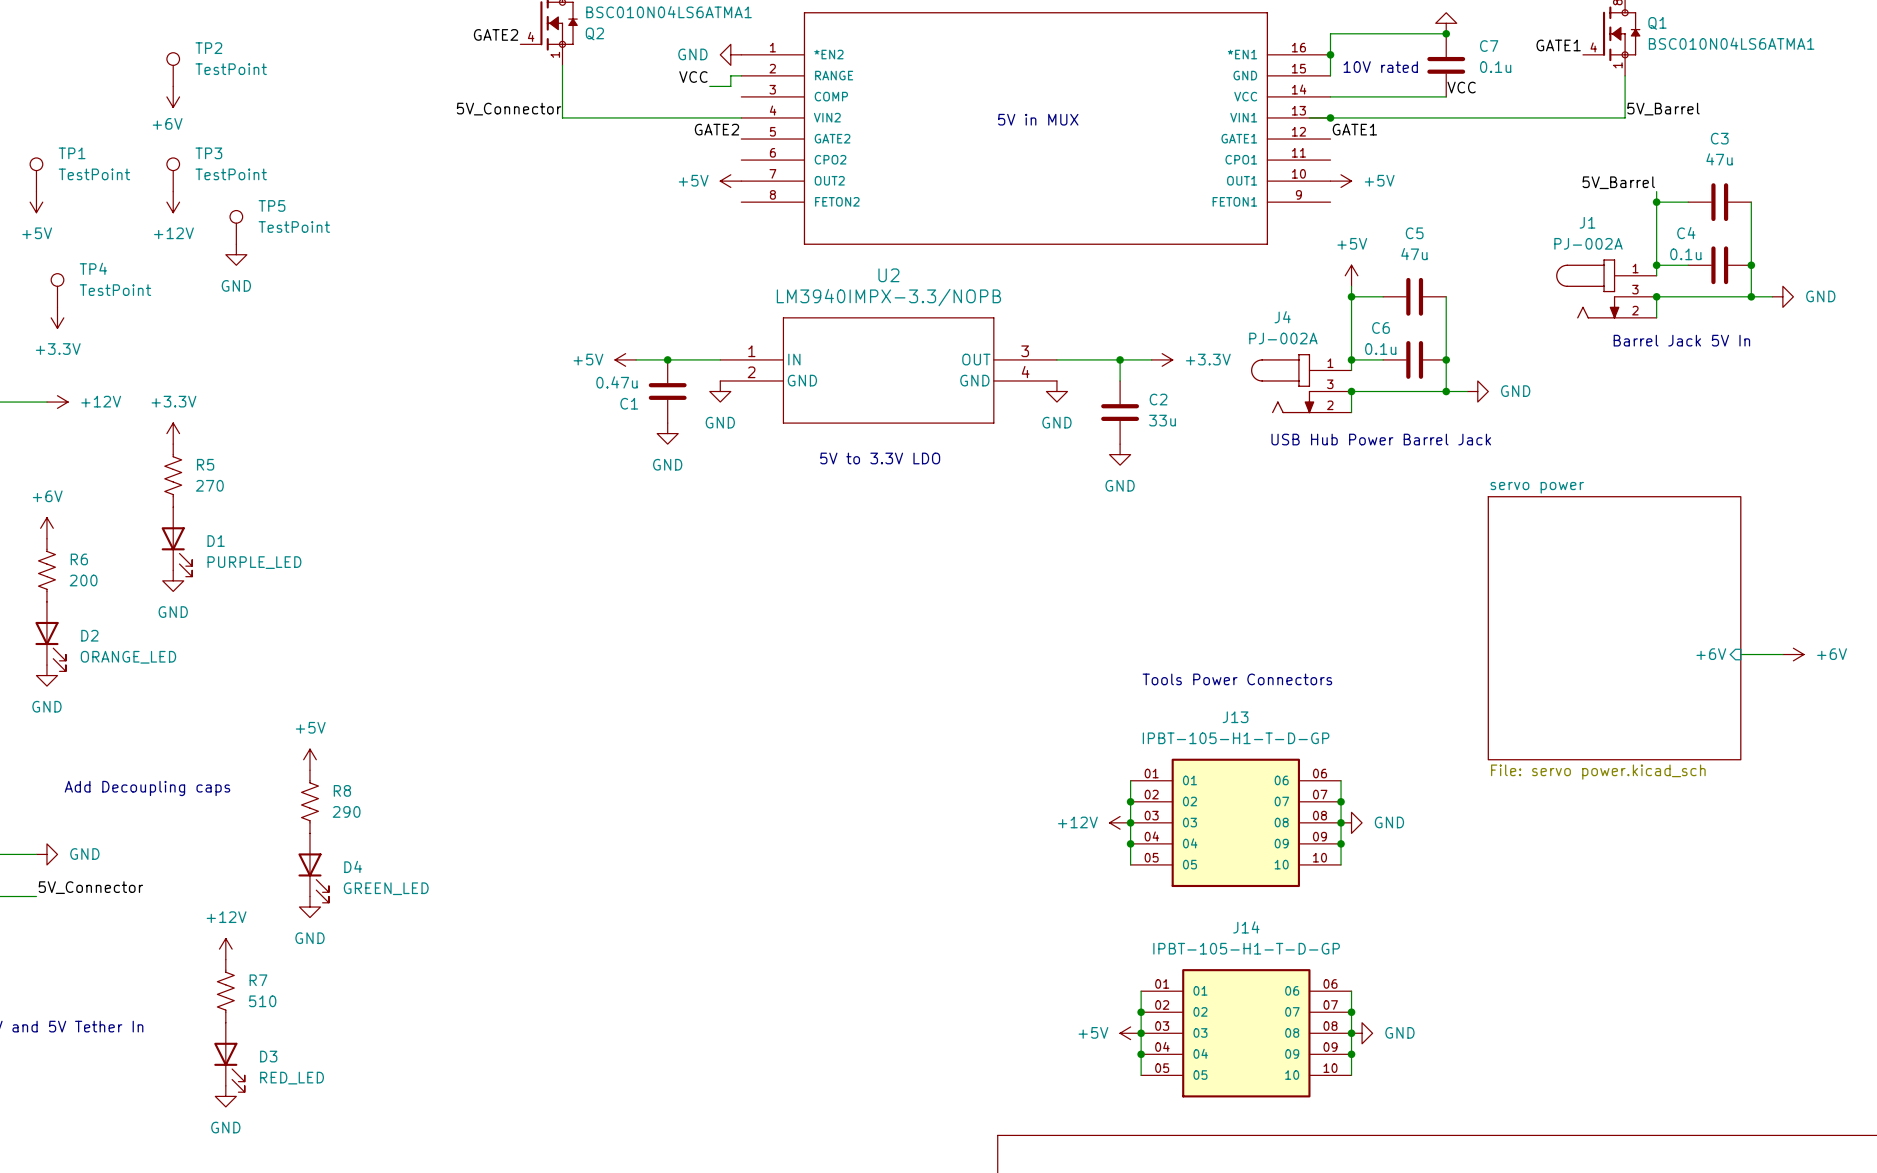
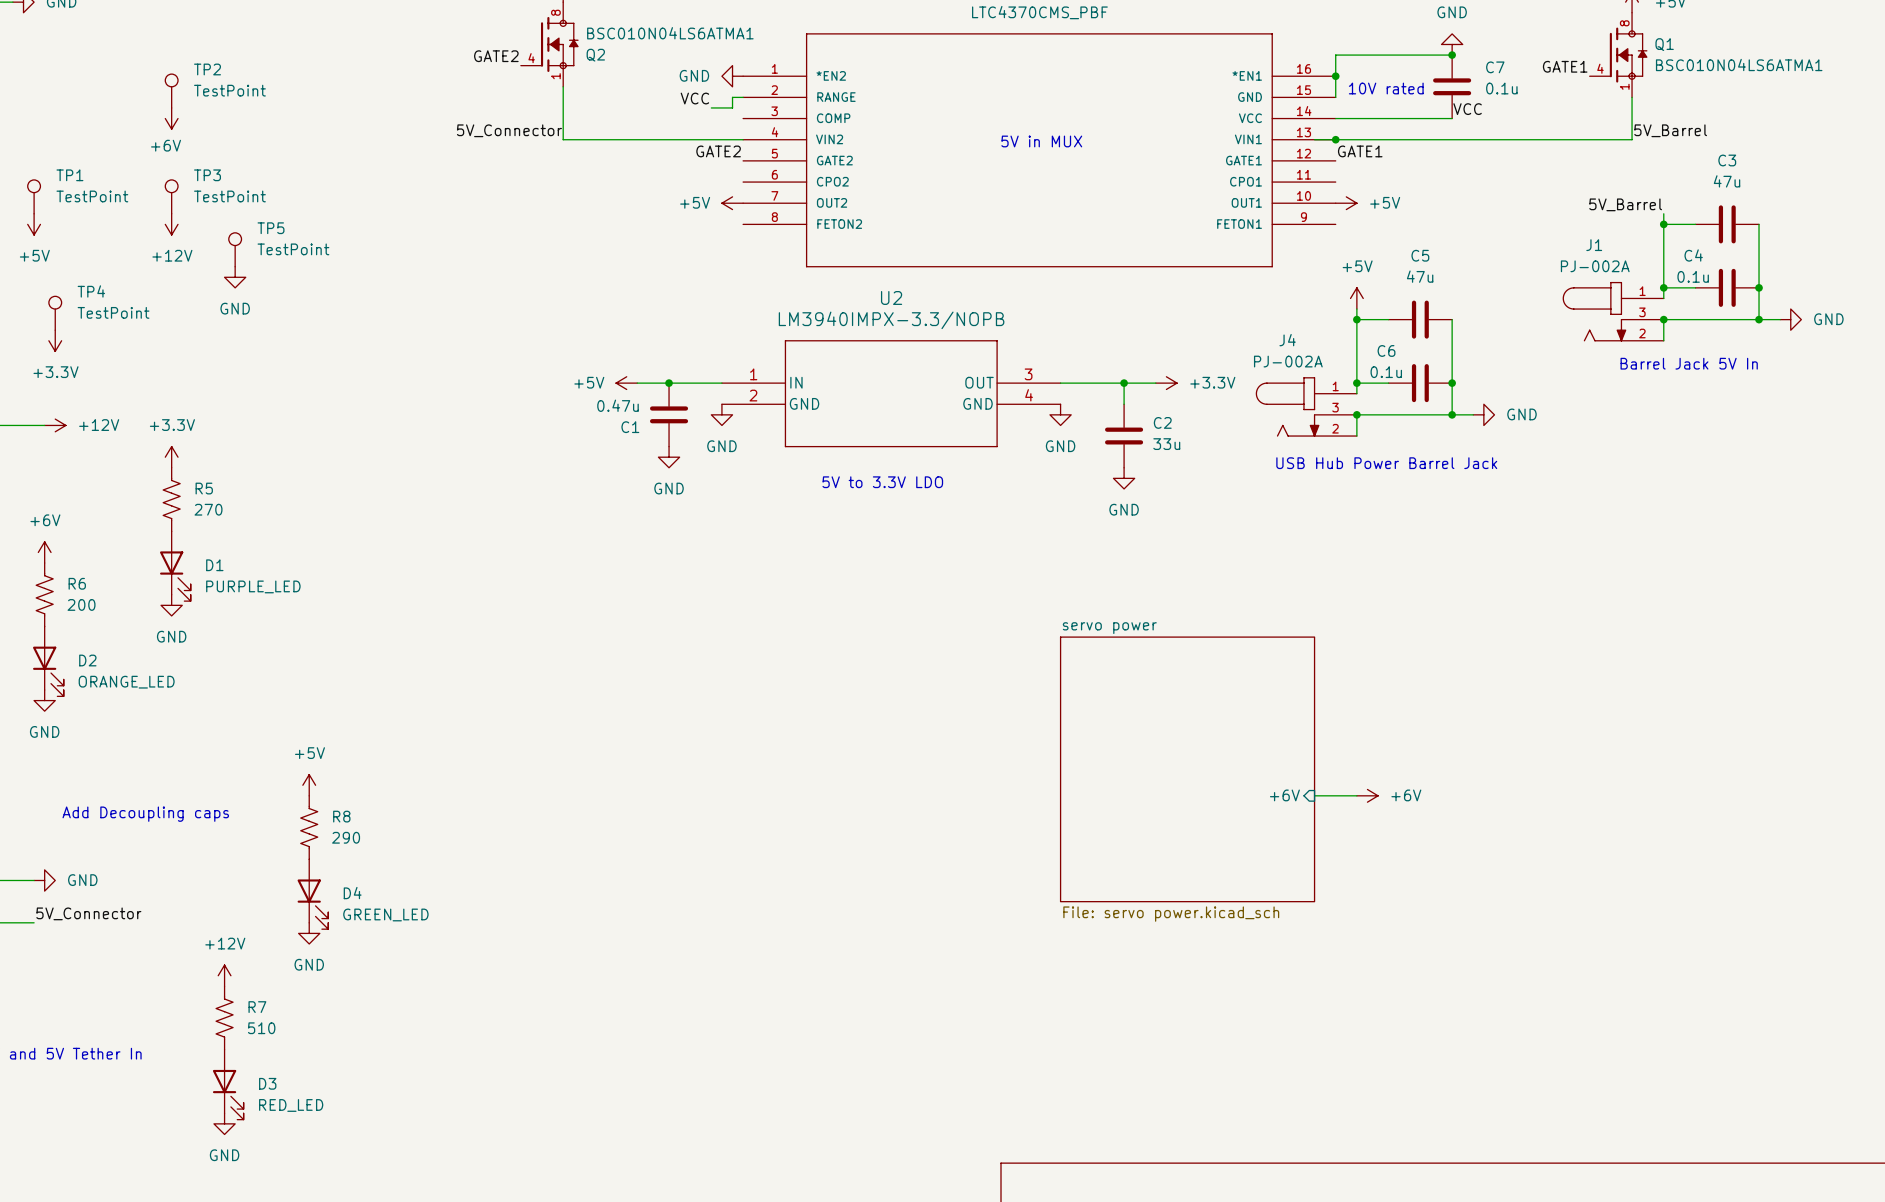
sheet servo power: File: servo power.kicad_sch (1614, 628) -> none
sheet pin: +6V (1711, 654) -> none
wire: (1740, 654) (1782, 654) -> none
power symbol: +6V (1793, 654) -> none
text: Tools Power Connectors (1237, 679) -> none
sheet servo power: none -> File: servo power.kicad_sch (1187, 769)
sheet pin: none -> +6V (1284, 795)
wire: none -> (1314, 795) (1356, 795)
power symbol: none -> +6V (1367, 795)
wire: (1130, 780) (1130, 864) -> none
wire: (1341, 780) (1341, 864) -> none
junction: (1130, 801) -> none
junction: (1341, 801) -> none
power symbol: +12V (1120, 822) -> none
junction: (1130, 822) -> none
J13: IPBT-105-H1-T-D-GP (1235, 822) -> none
junction: (1341, 822) -> none
power symbol: GND (1351, 822) -> none
junction: (1130, 843) -> none
junction: (1341, 843) -> none
wire: (1141, 991) (1141, 1075) -> none
wire: (1351, 991) (1351, 1075) -> none
junction: (1141, 1012) -> none
junction: (1351, 1012) -> none
power symbol: +5V (1130, 1033) -> none
junction: (1141, 1033) -> none
J14: IPBT-105-H1-T-D-GP (1246, 1033) -> none
junction: (1351, 1033) -> none
power symbol: GND (1362, 1033) -> none
junction: (1141, 1054) -> none
junction: (1351, 1054) -> none

